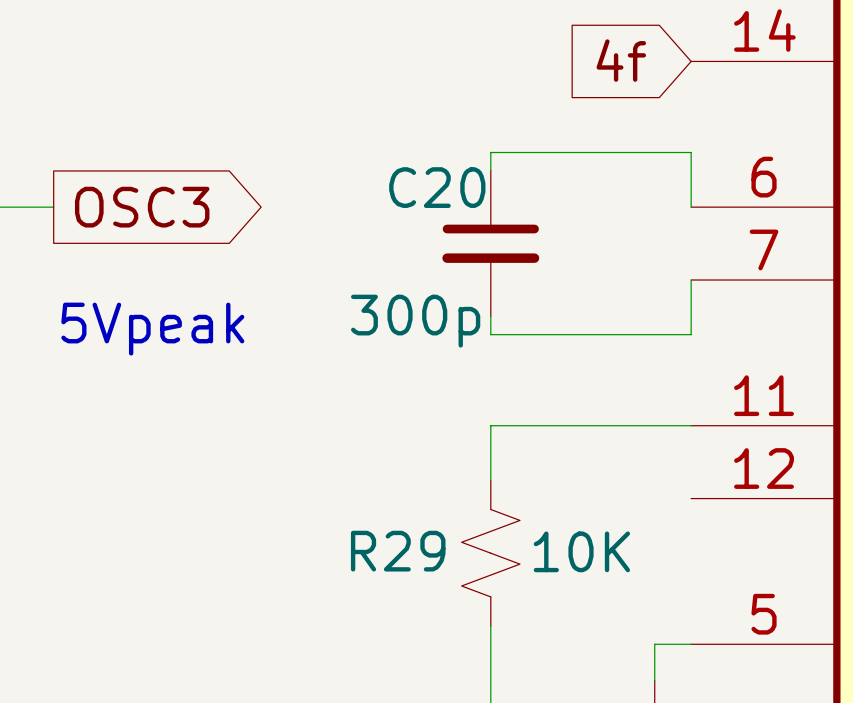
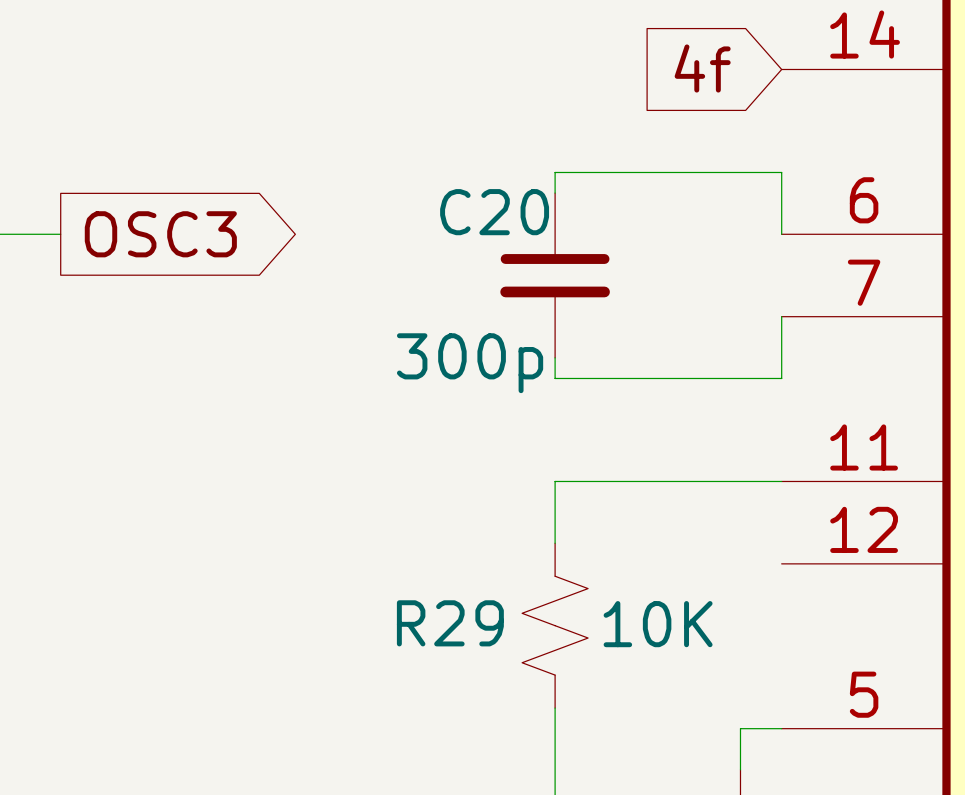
text: 5Vpeak (152, 329) -> none

